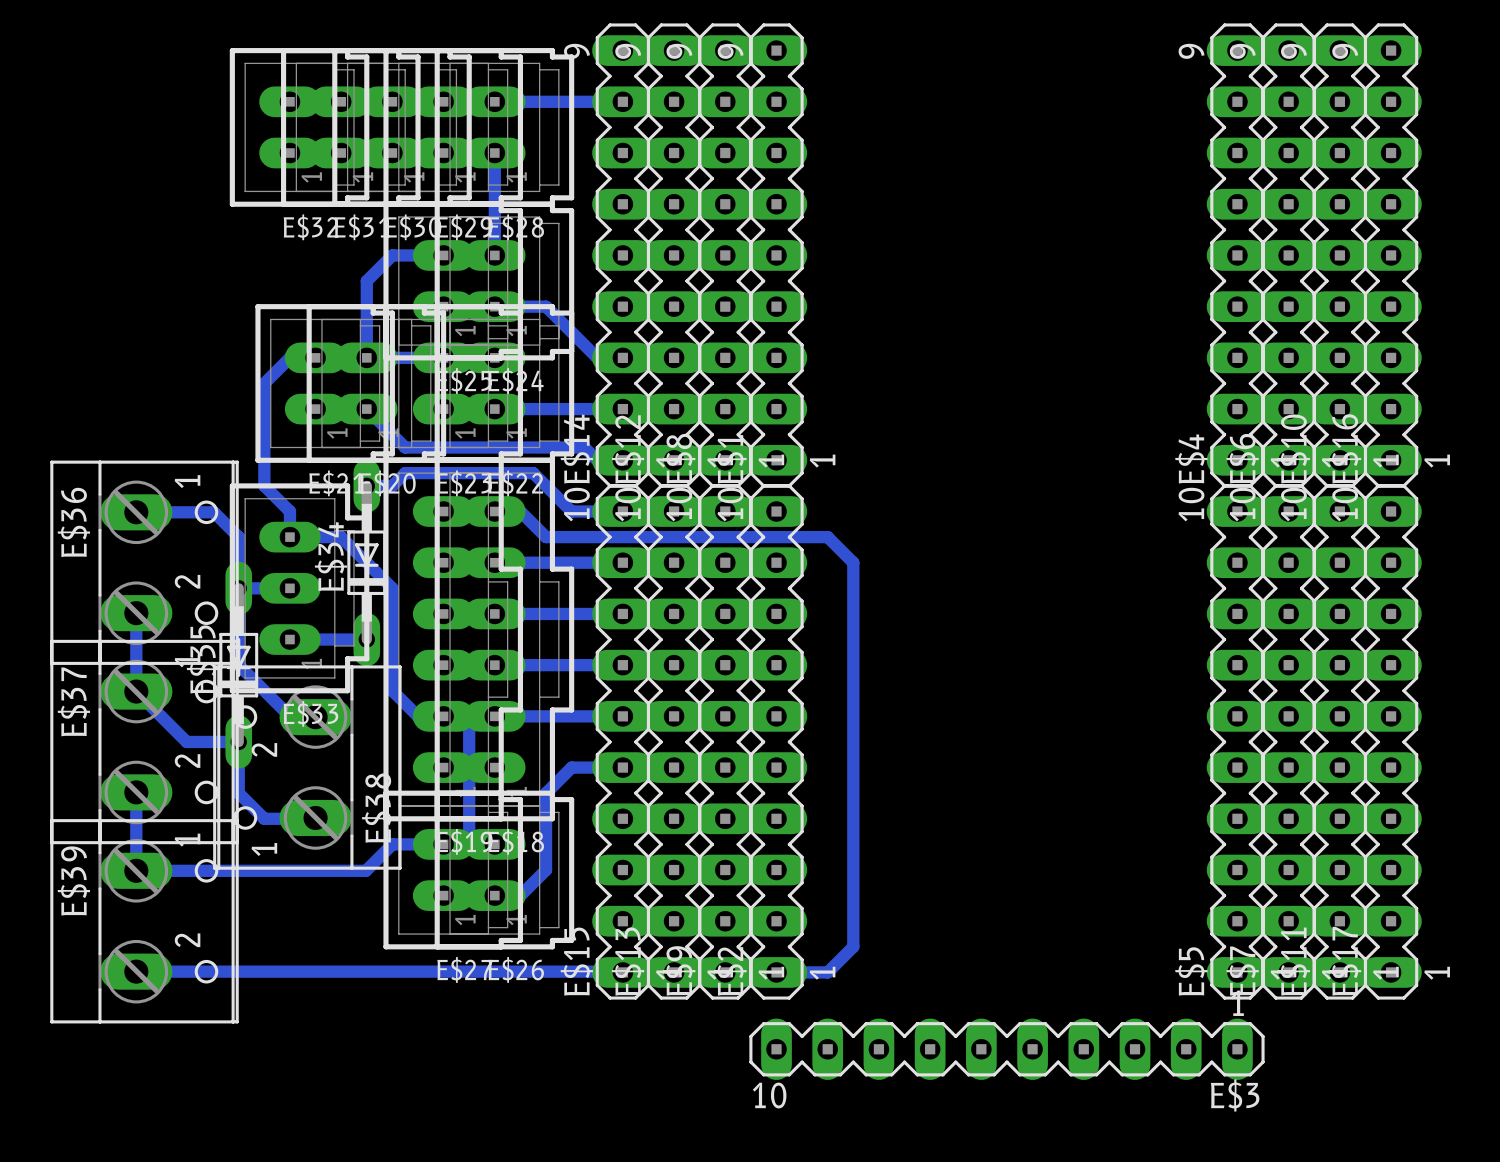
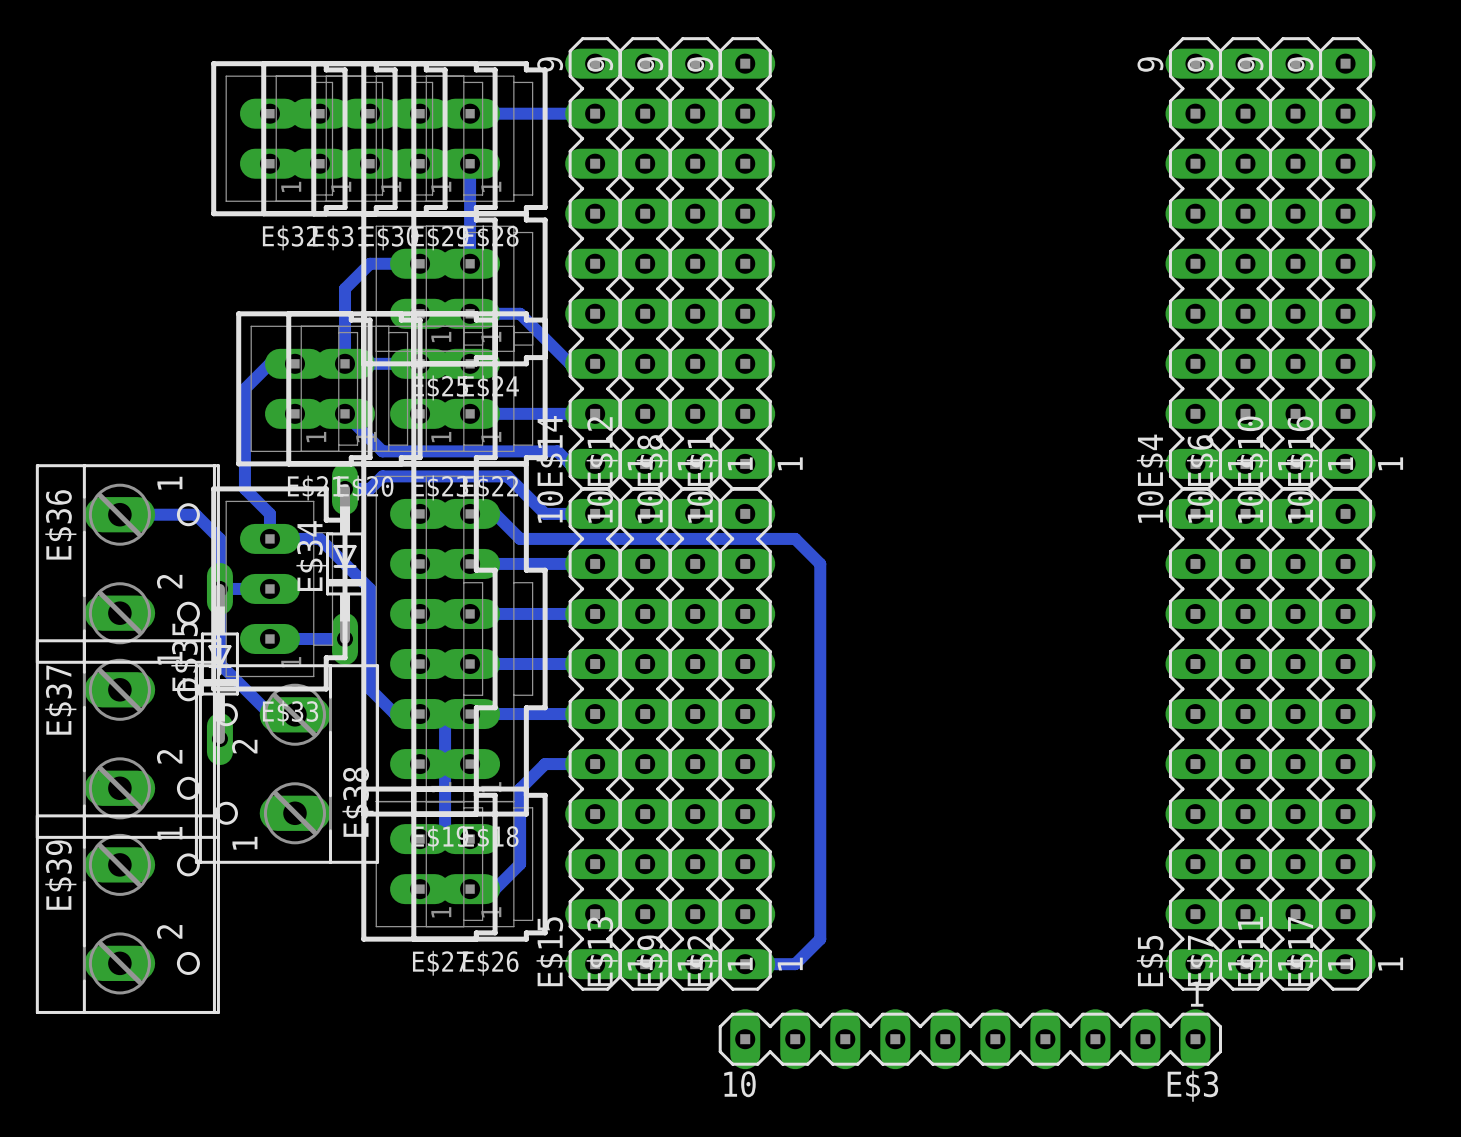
bottom track: (136, 613) (136, 691) (186, 741) (238, 741) (238, 793) (264, 818) (315, 817) -> none
bottom track: (136, 792) (136, 870) (365, 870) (392, 844) (443, 844) -> none
bottom track: (136, 971) (622, 972) -> none

